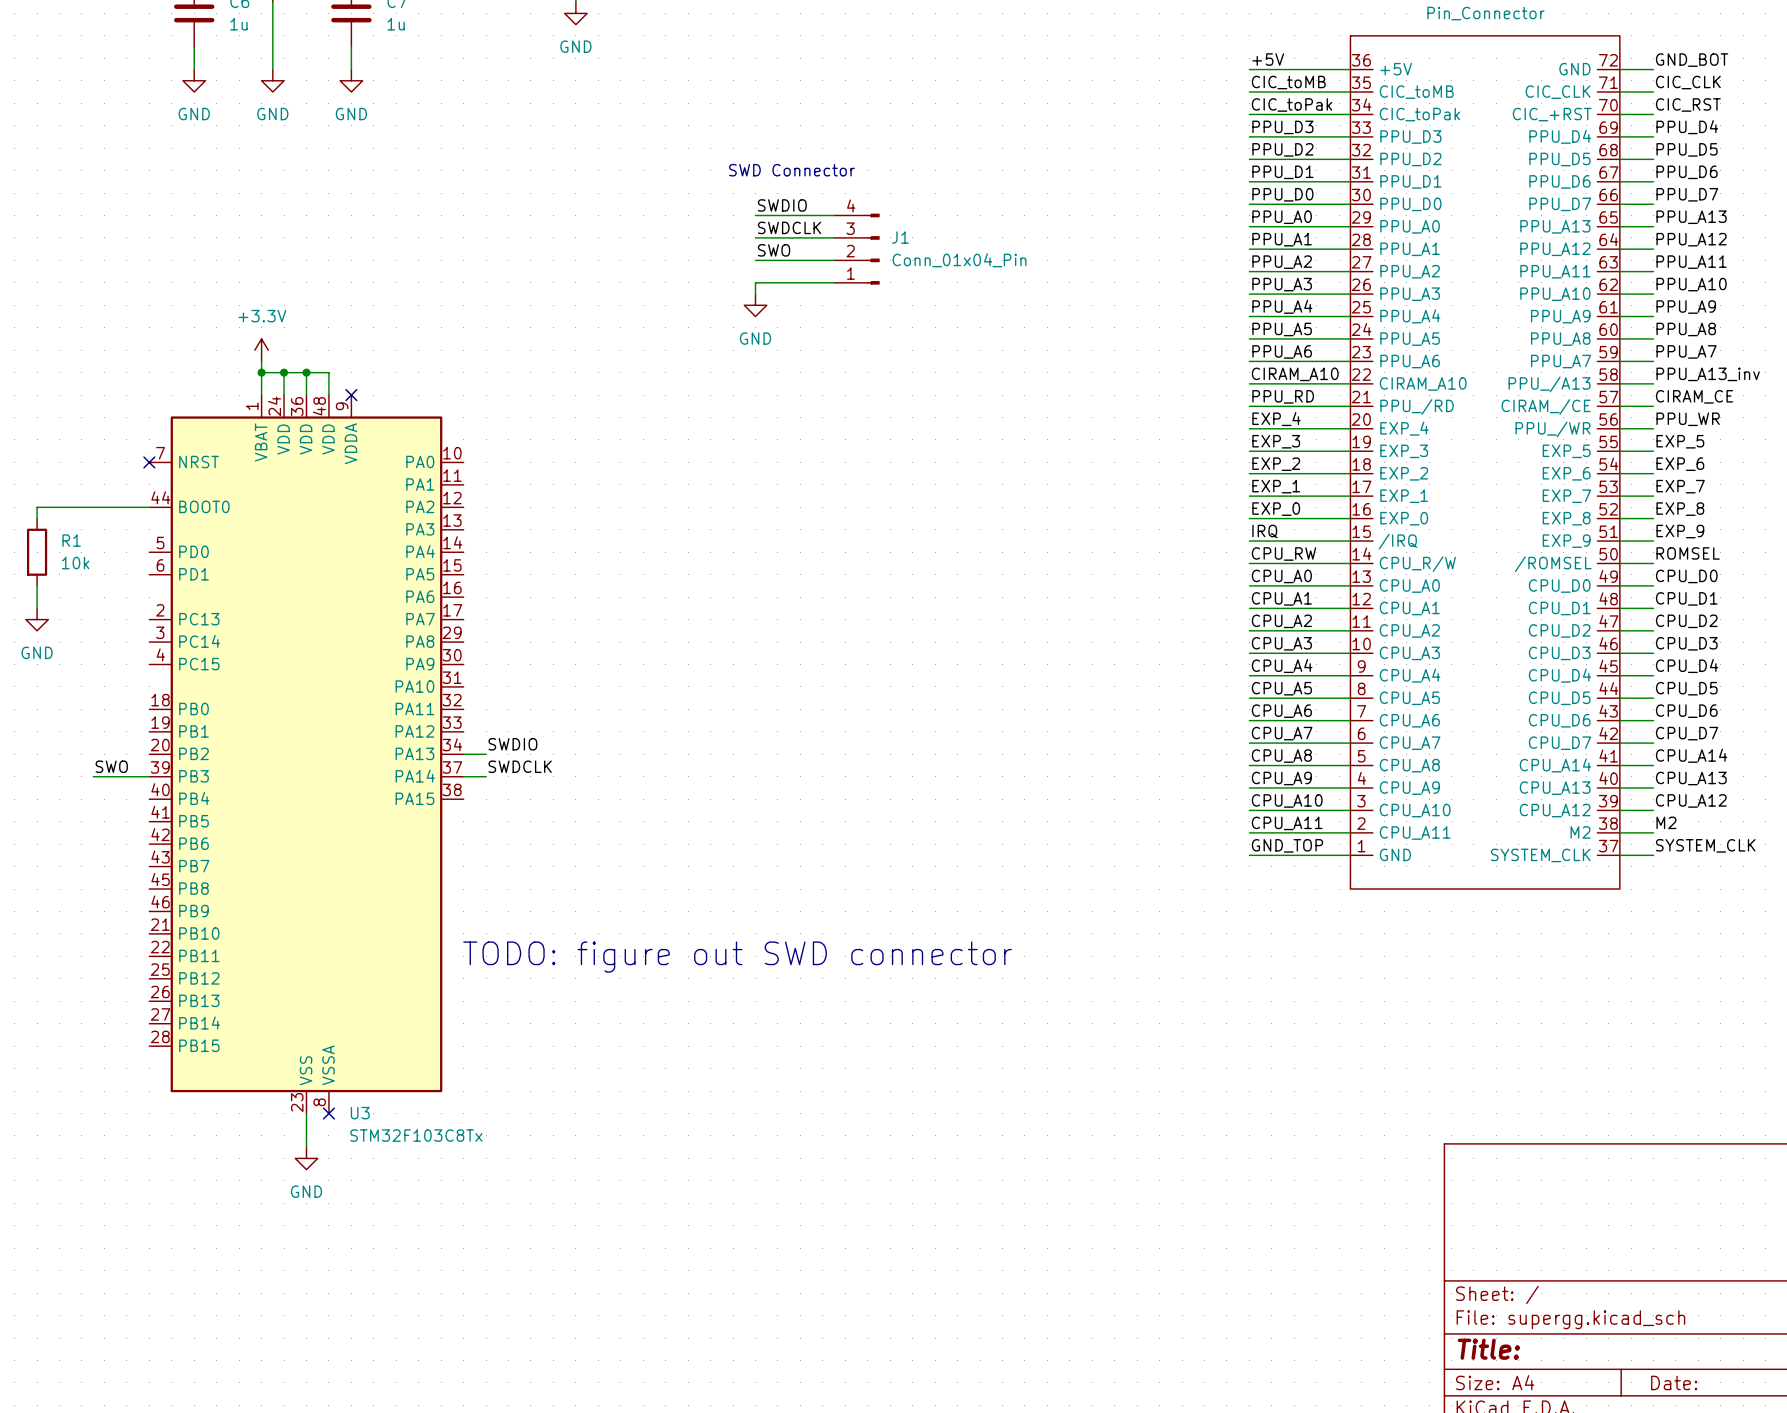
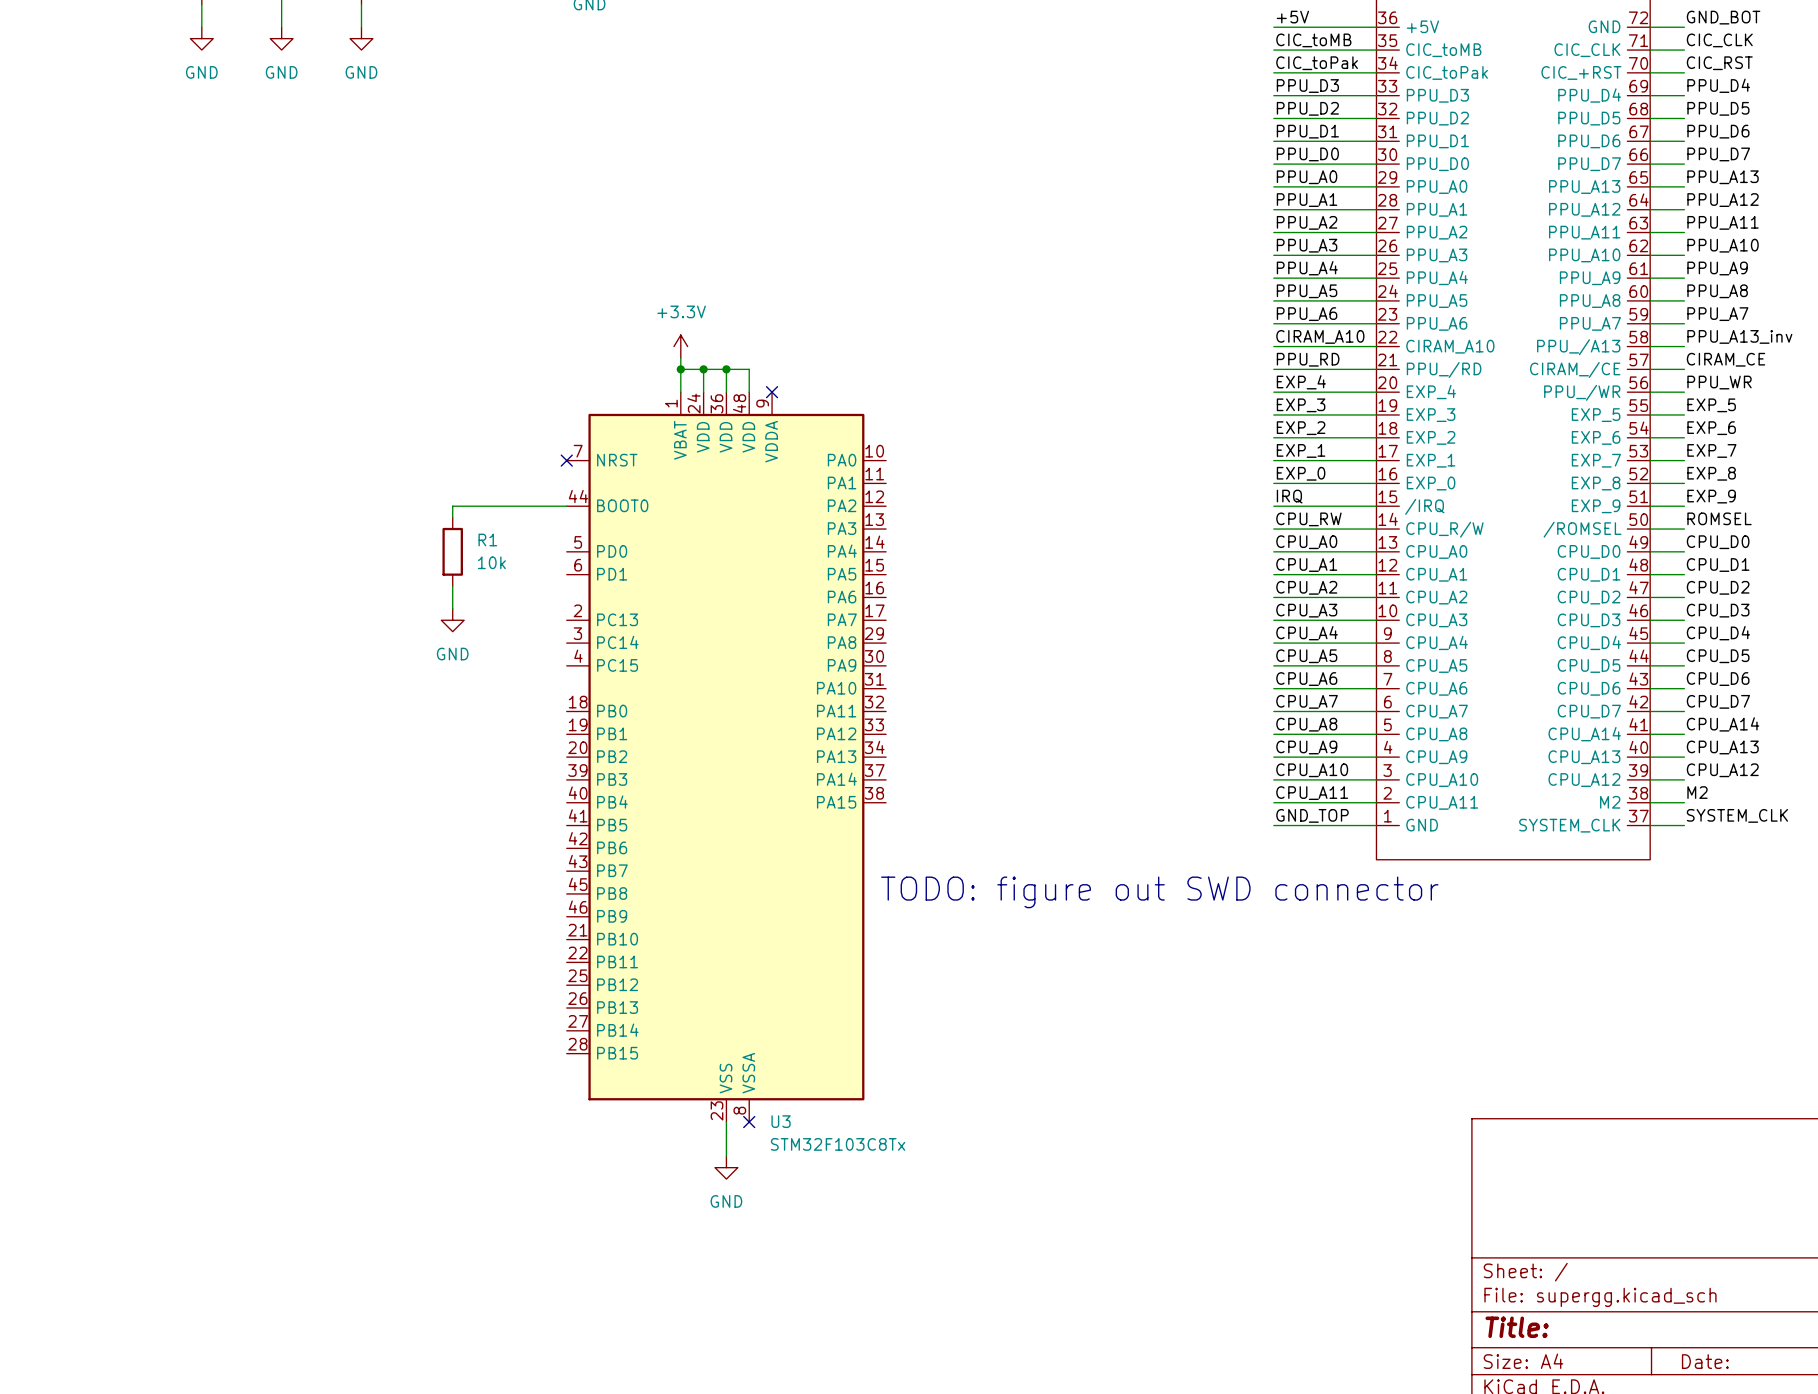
text: SWD Connector (791, 170) -> none
label: SWDIO (782, 205) -> none
wire: (755, 215) (834, 215) -> none
label: SWDCLK (789, 227) -> none
wire: (755, 237) (834, 237) -> none
J1: Conn_01x04_Pin (856, 249) -> none
label: SWO (774, 250) -> none
wire: (755, 260) (834, 260) -> none
wire: (834, 282) (755, 282) (755, 294) -> none
power symbol: GND (755, 305) -> none
power symbol: +3.3V (261, 350) -> none
wire: (261, 361) (261, 395) -> none
wire: (261, 372) (328, 372) (328, 395) -> none
junction: (261, 372) -> none
wire: (284, 372) (284, 395) -> none
junction: (284, 372) -> none
wire: (306, 372) (306, 395) -> none
junction: (306, 372) -> none
power symbol: none -> +3.3V (680, 346)
no-connect mark: (351, 395) -> none
wire: none -> (680, 357) (680, 392)
wire: none -> (680, 369) (749, 369) (749, 392)
junction: none -> (680, 369)
wire: none -> (703, 369) (703, 392)
junction: none -> (703, 369)
wire: none -> (726, 369) (726, 392)
junction: none -> (726, 369)
no-connect mark: none -> (772, 392)
no-connect mark: (149, 462) -> none
no-connect mark: none -> (566, 460)
wire: (149, 507) (37, 507) (37, 518) -> none
wire: none -> (566, 506) (452, 506) (452, 517)
R1 position: (37, 552) -> (452, 551)
wire: (37, 585) (37, 608) -> none
power symbol: GND (37, 619) -> none
power symbol: none -> GND (452, 620)
label: SWDIO (512, 744) -> none
U3 position: (306, 754) -> (726, 757)
wire: (463, 754) (486, 754) -> none
label: SWO (111, 766) -> none
label: SWDCLK (520, 766) -> none
wire: (93, 776) (149, 776) -> none
wire: (463, 776) (486, 776) -> none
text: none -> TODO: figure out SWD connector (1159, 892)
text: TODO: figure out SWD connector (737, 957) -> none
wire: (306, 1113) (306, 1147) -> none
no-connect mark: (328, 1113) -> none
wire: none -> (726, 1122) (726, 1156)
no-connect mark: none -> (749, 1122)
power symbol: GND (306, 1158) -> none
power symbol: none -> GND (726, 1167)

